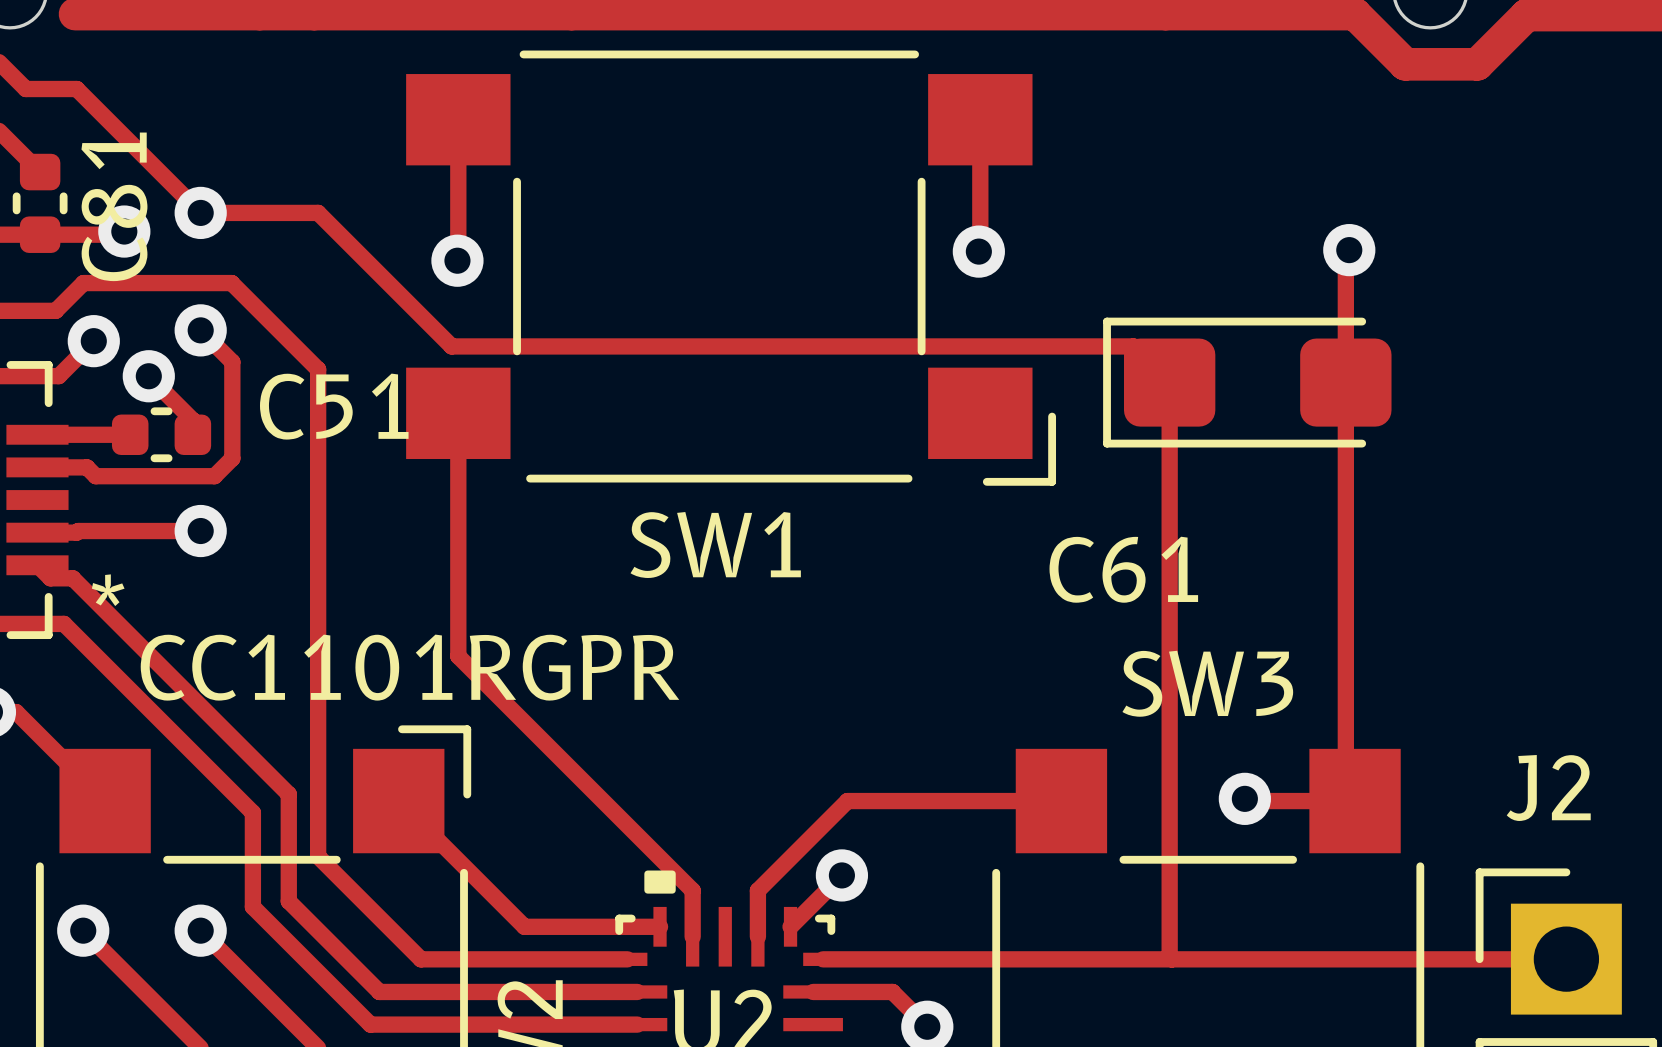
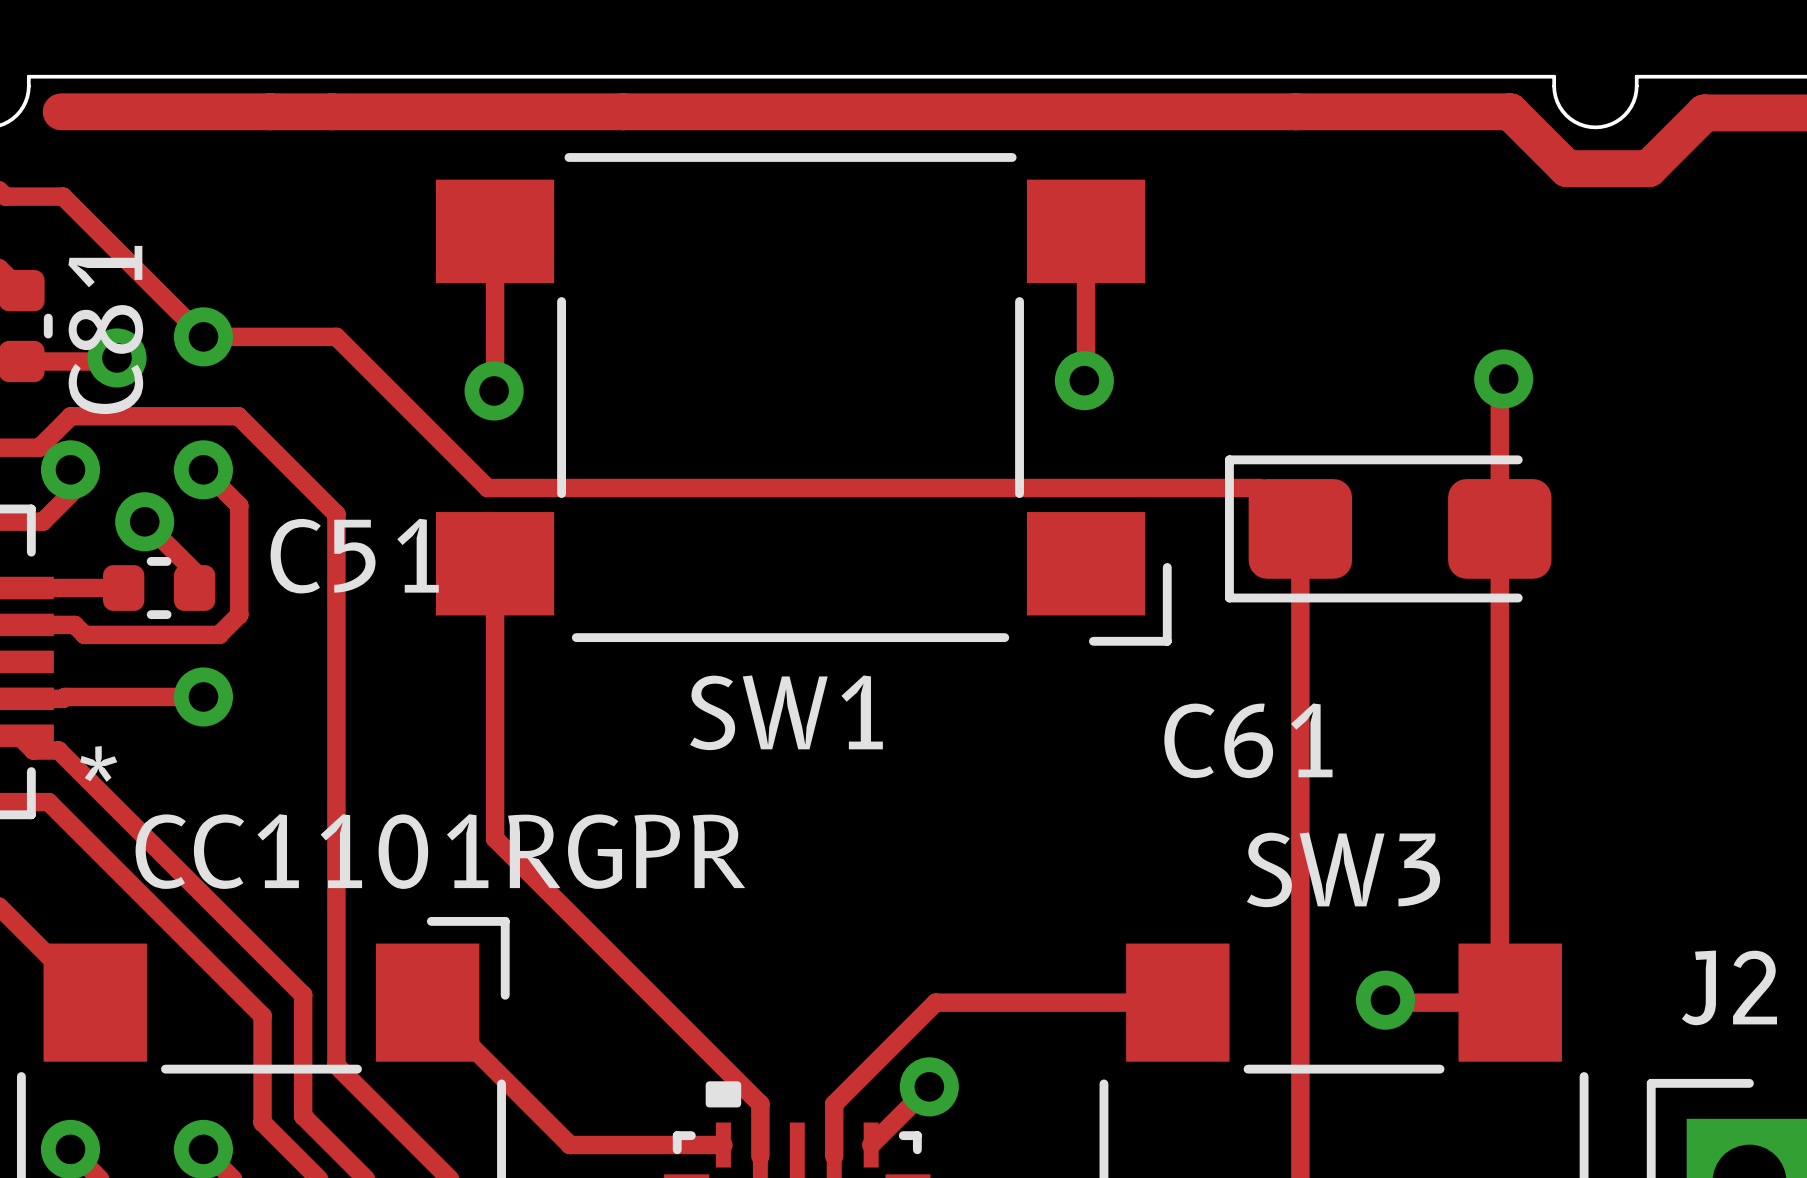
via position: (93, 341) -> (70, 469)

